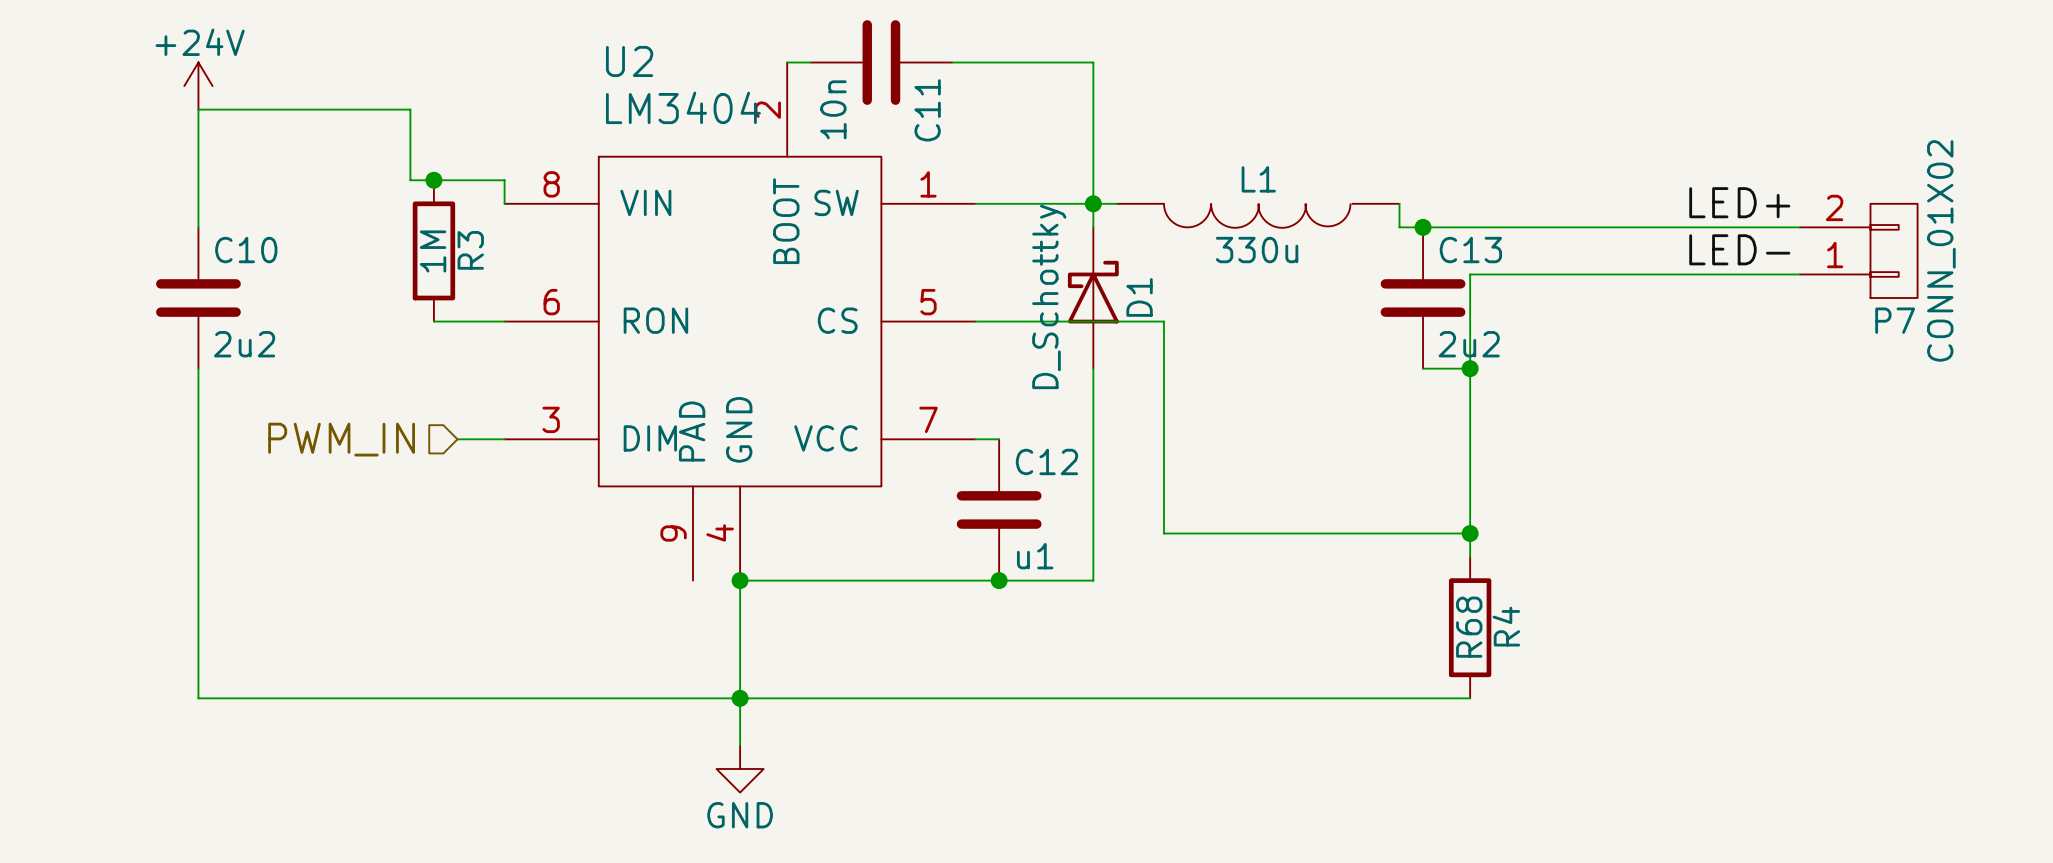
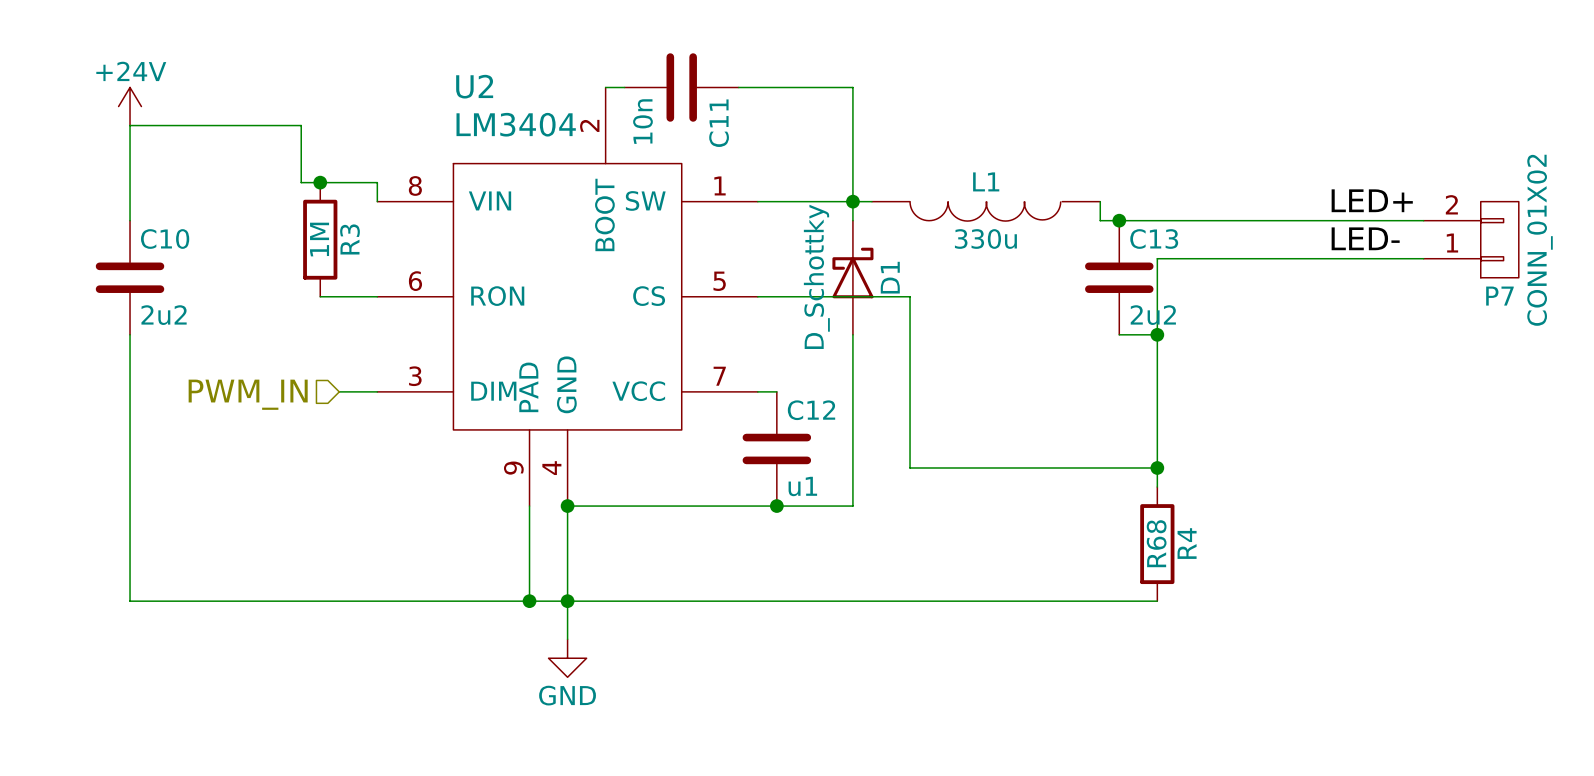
wire: none -> (529, 506) (529, 601)
junction: none -> (529, 601)

